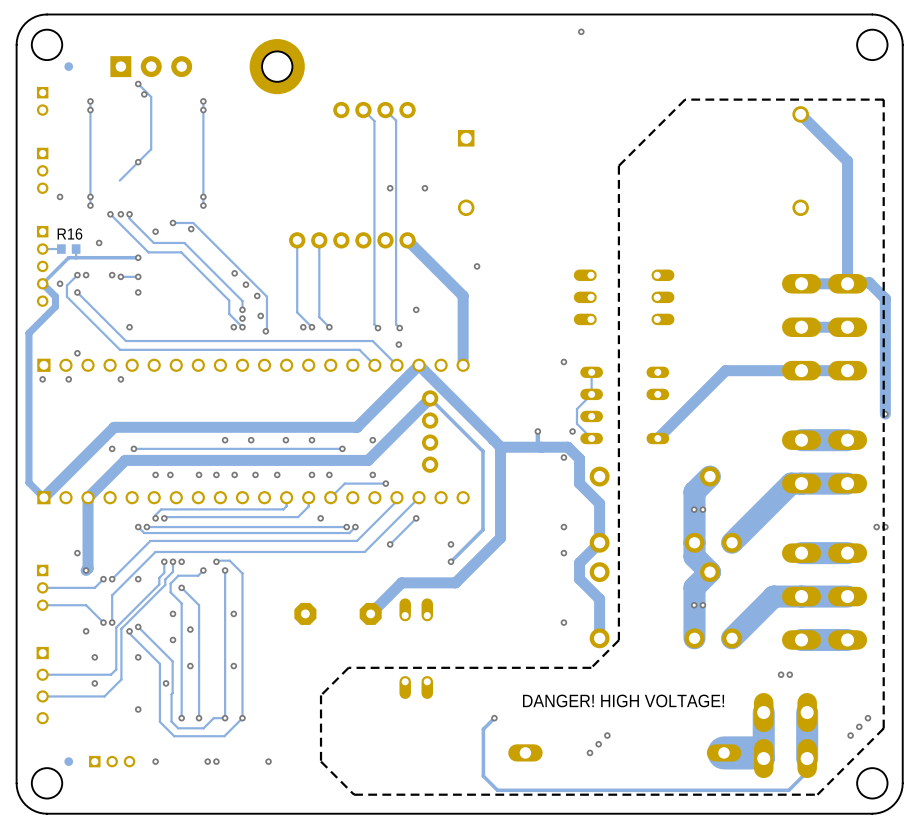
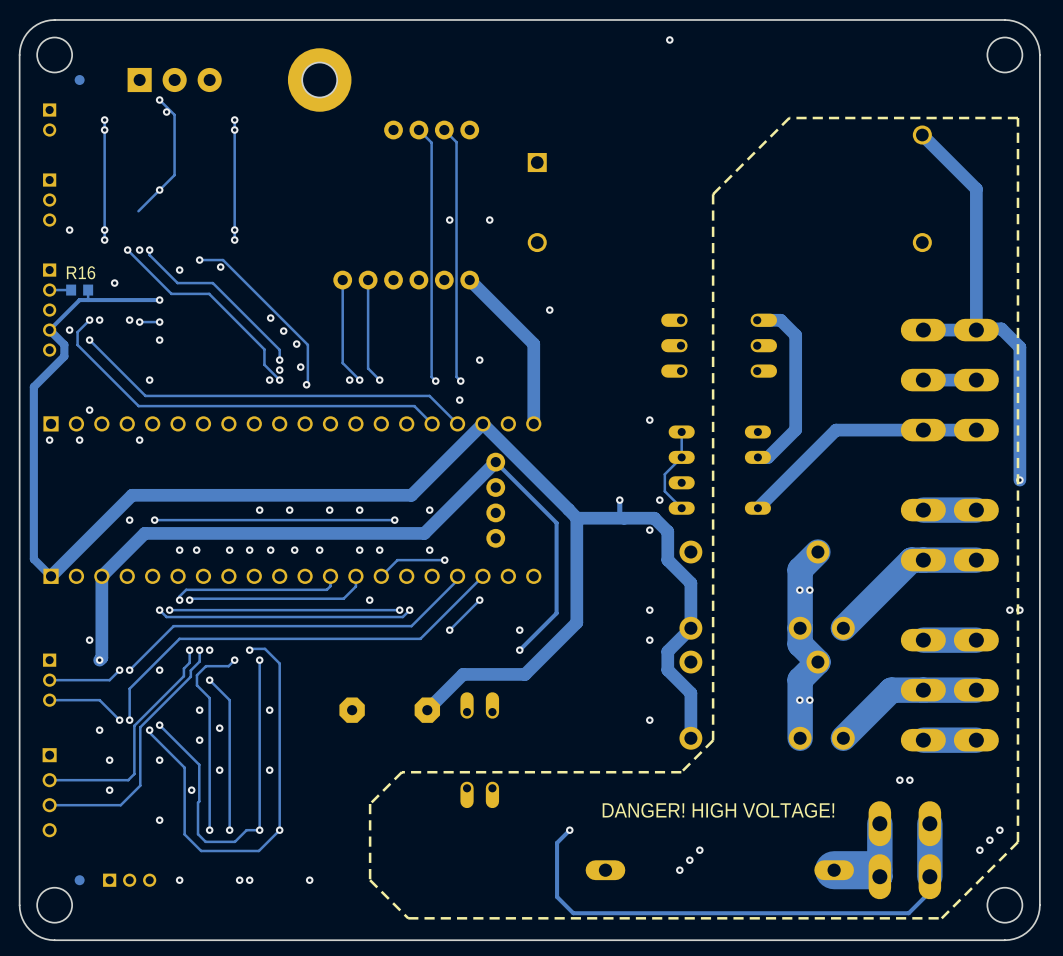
track: none -> (757, 320) (780, 320) (795, 335) (795, 429) (768, 457) (757, 457)

